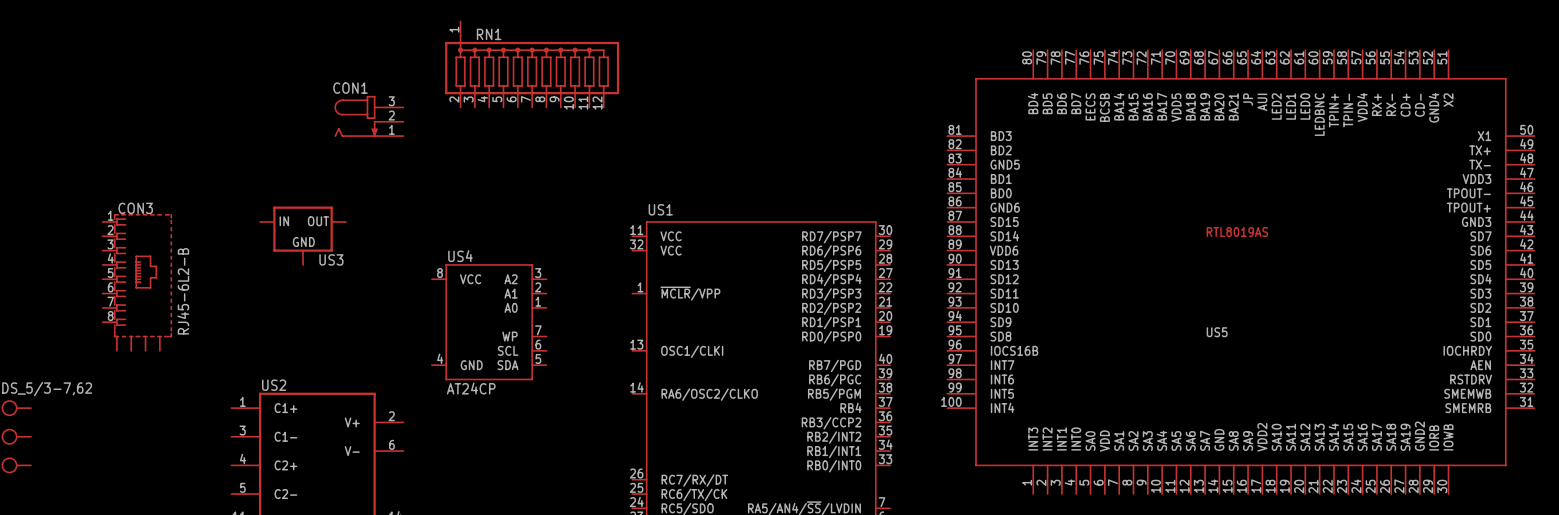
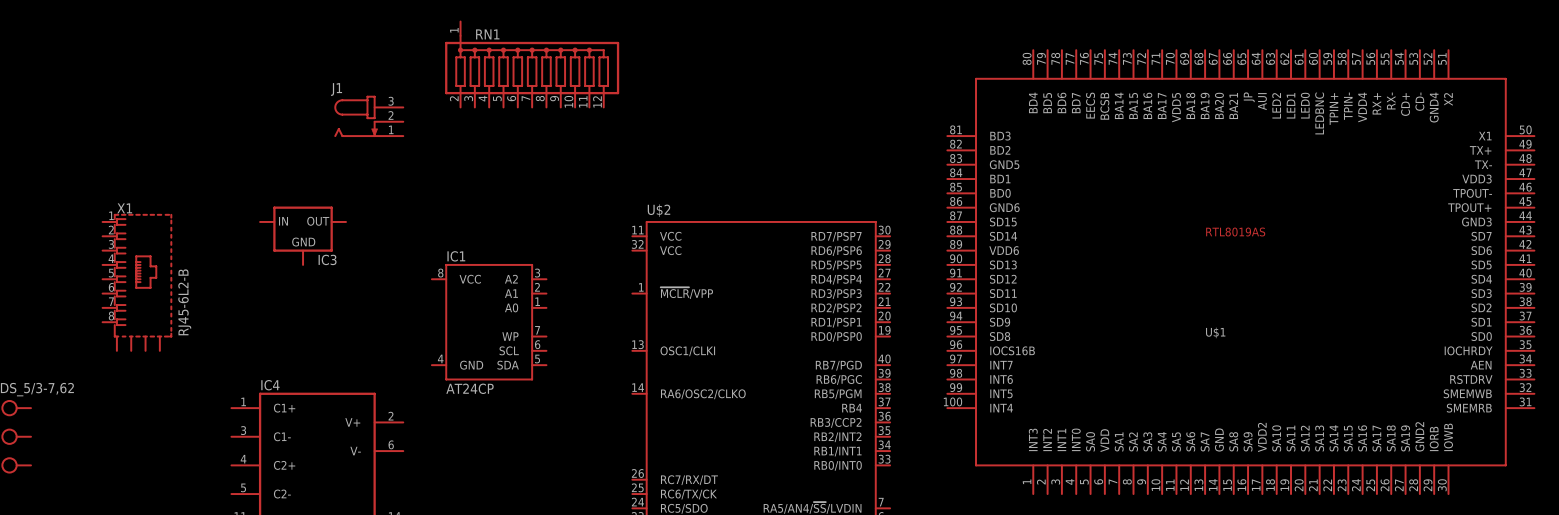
CON1 name: CON1 (350, 88) -> J1 (336, 89)
CON3 name: CON3 (135, 208) -> X1 (124, 208)
US1 name: US1 (660, 209) -> U$2 (659, 210)
US4 name: US4 (460, 256) -> IC1 (456, 256)
US3 name: US3 (331, 259) -> IC3 (327, 259)
US5 name: US5 (1217, 332) -> U$1 (1215, 332)
US2 name: US2 (274, 385) -> IC4 (270, 385)

